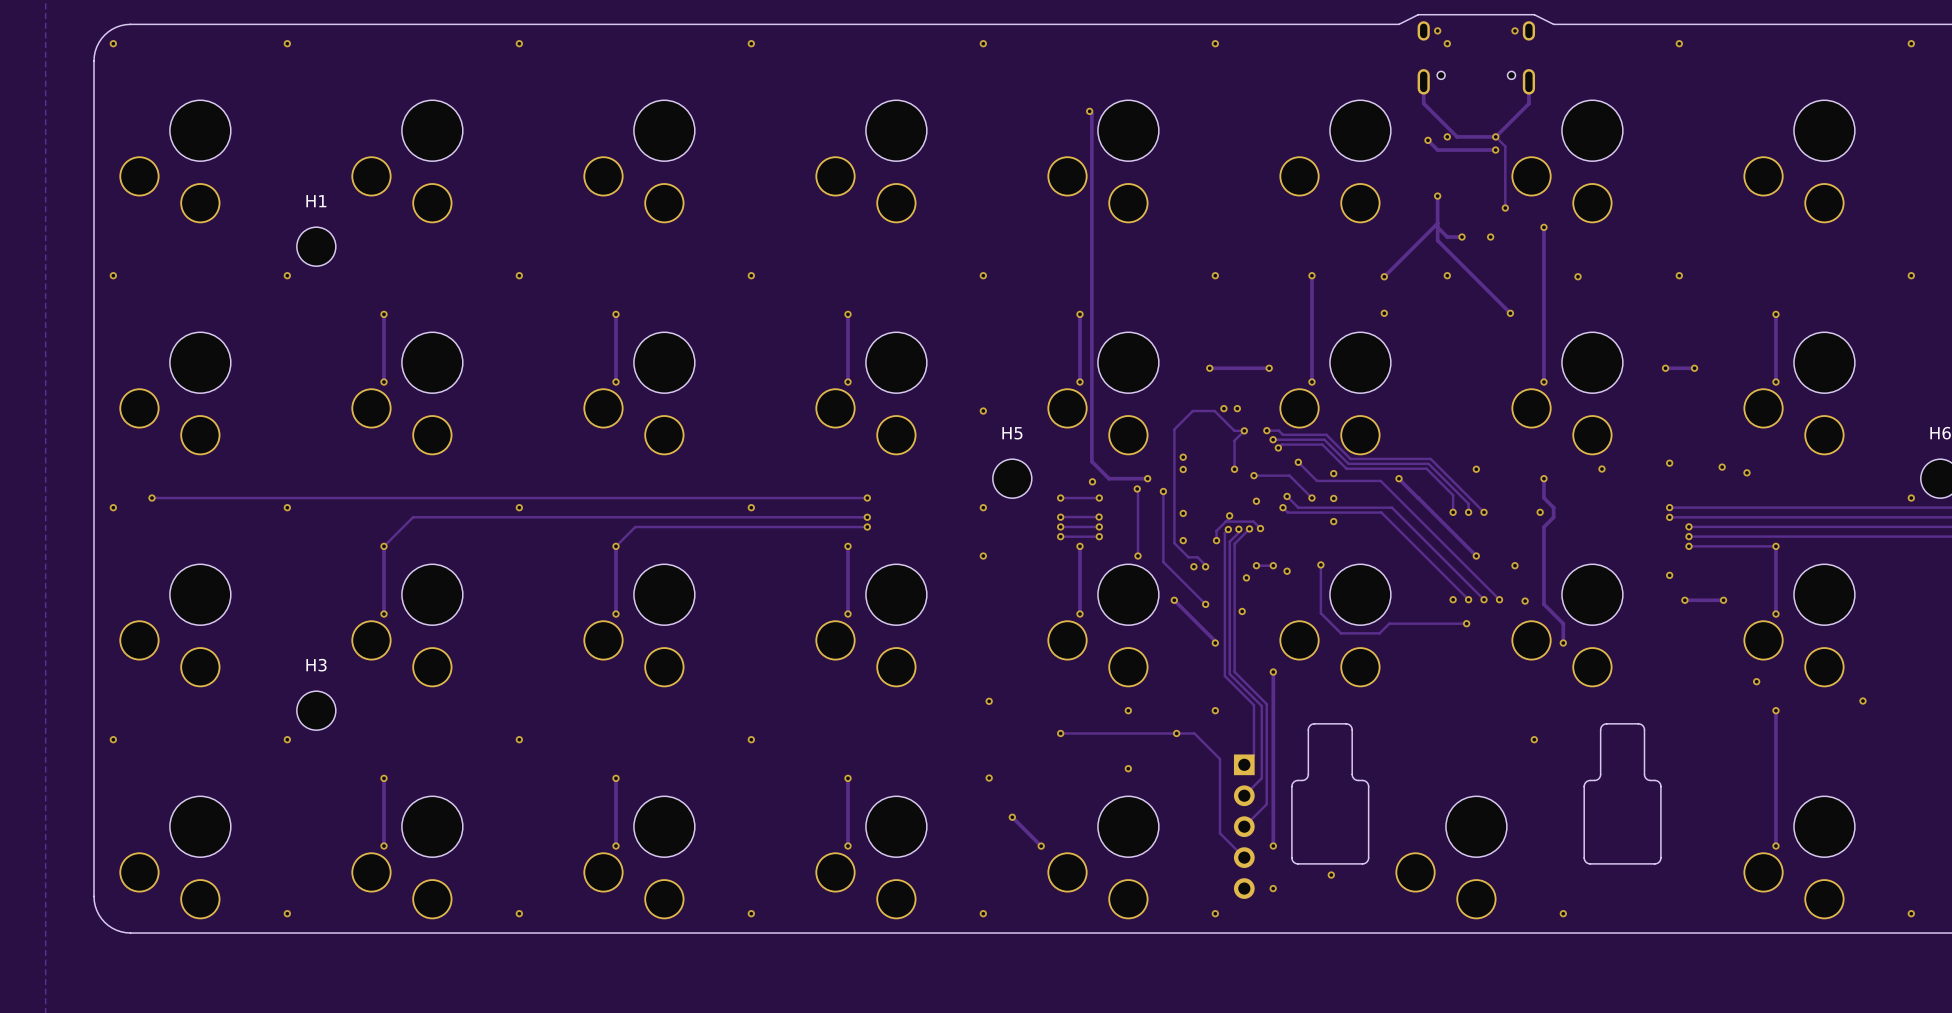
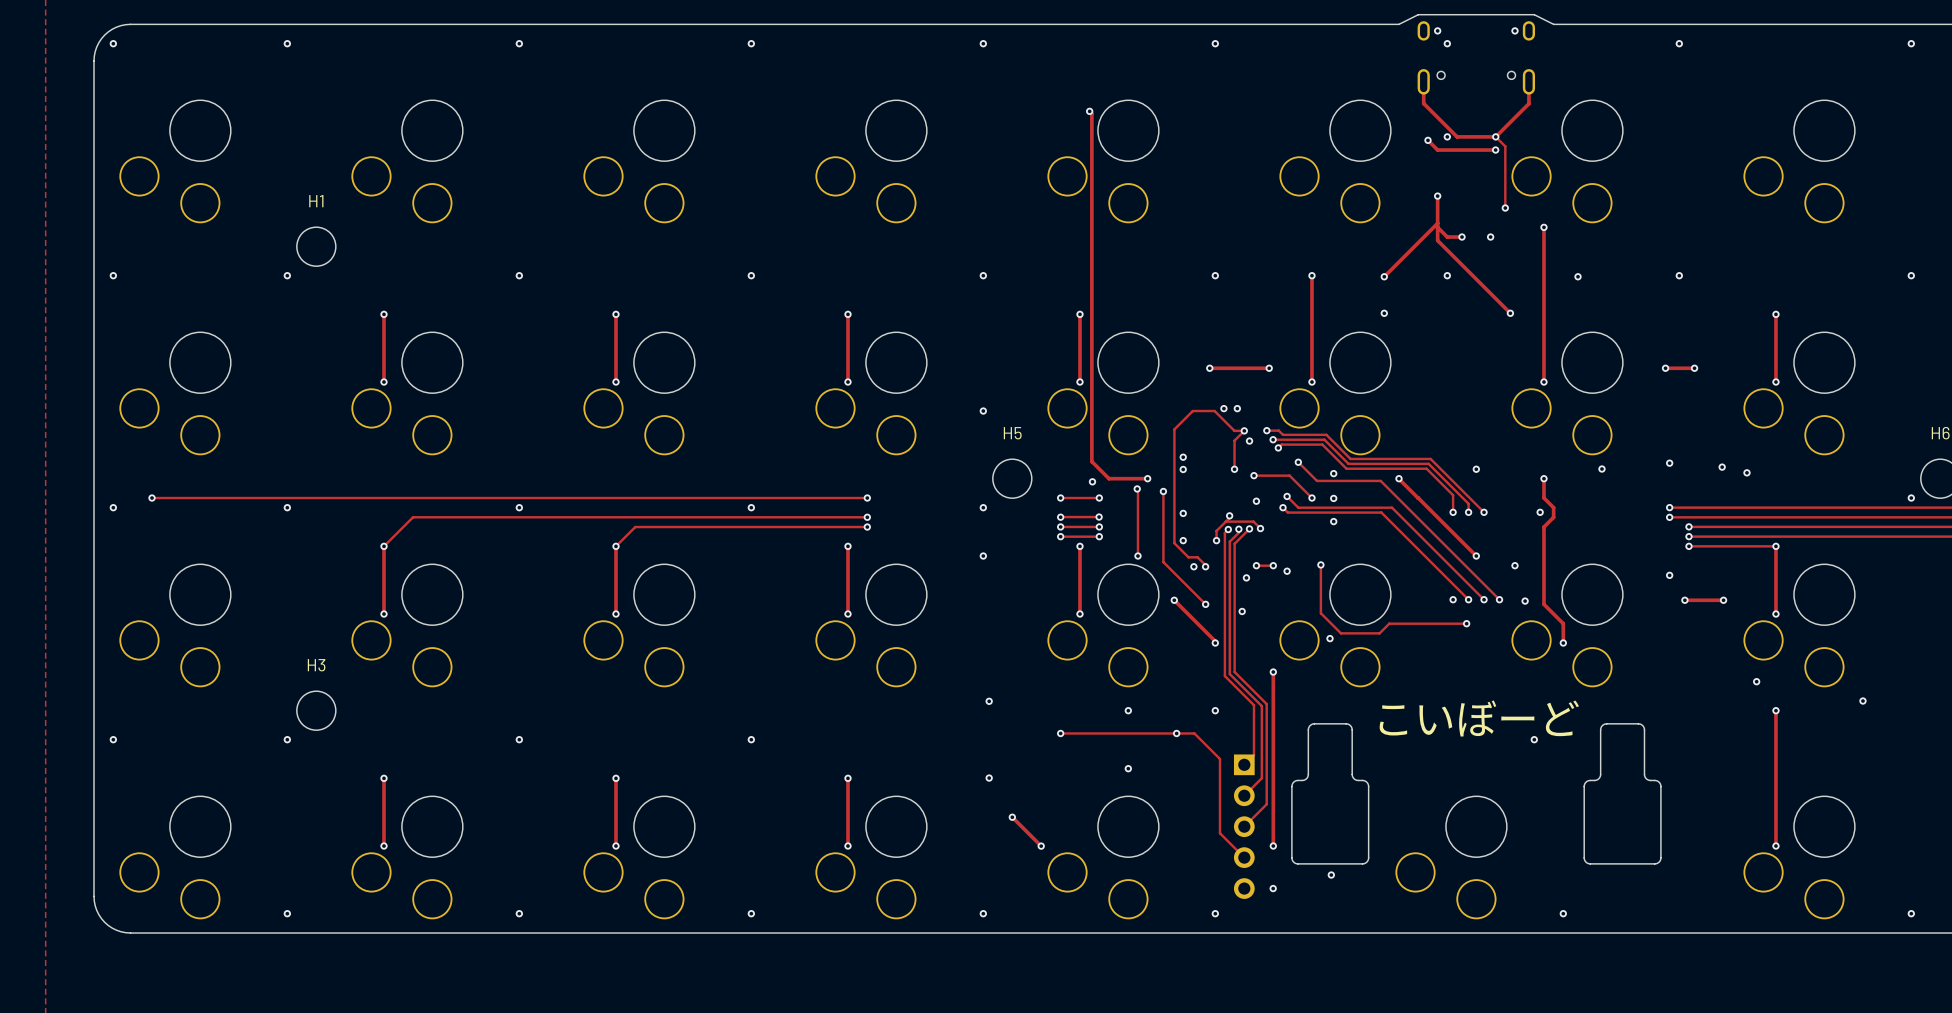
via: none -> (1249, 441)
via: none -> (1330, 638)
text: none -> こいぼーど (1479, 718)

